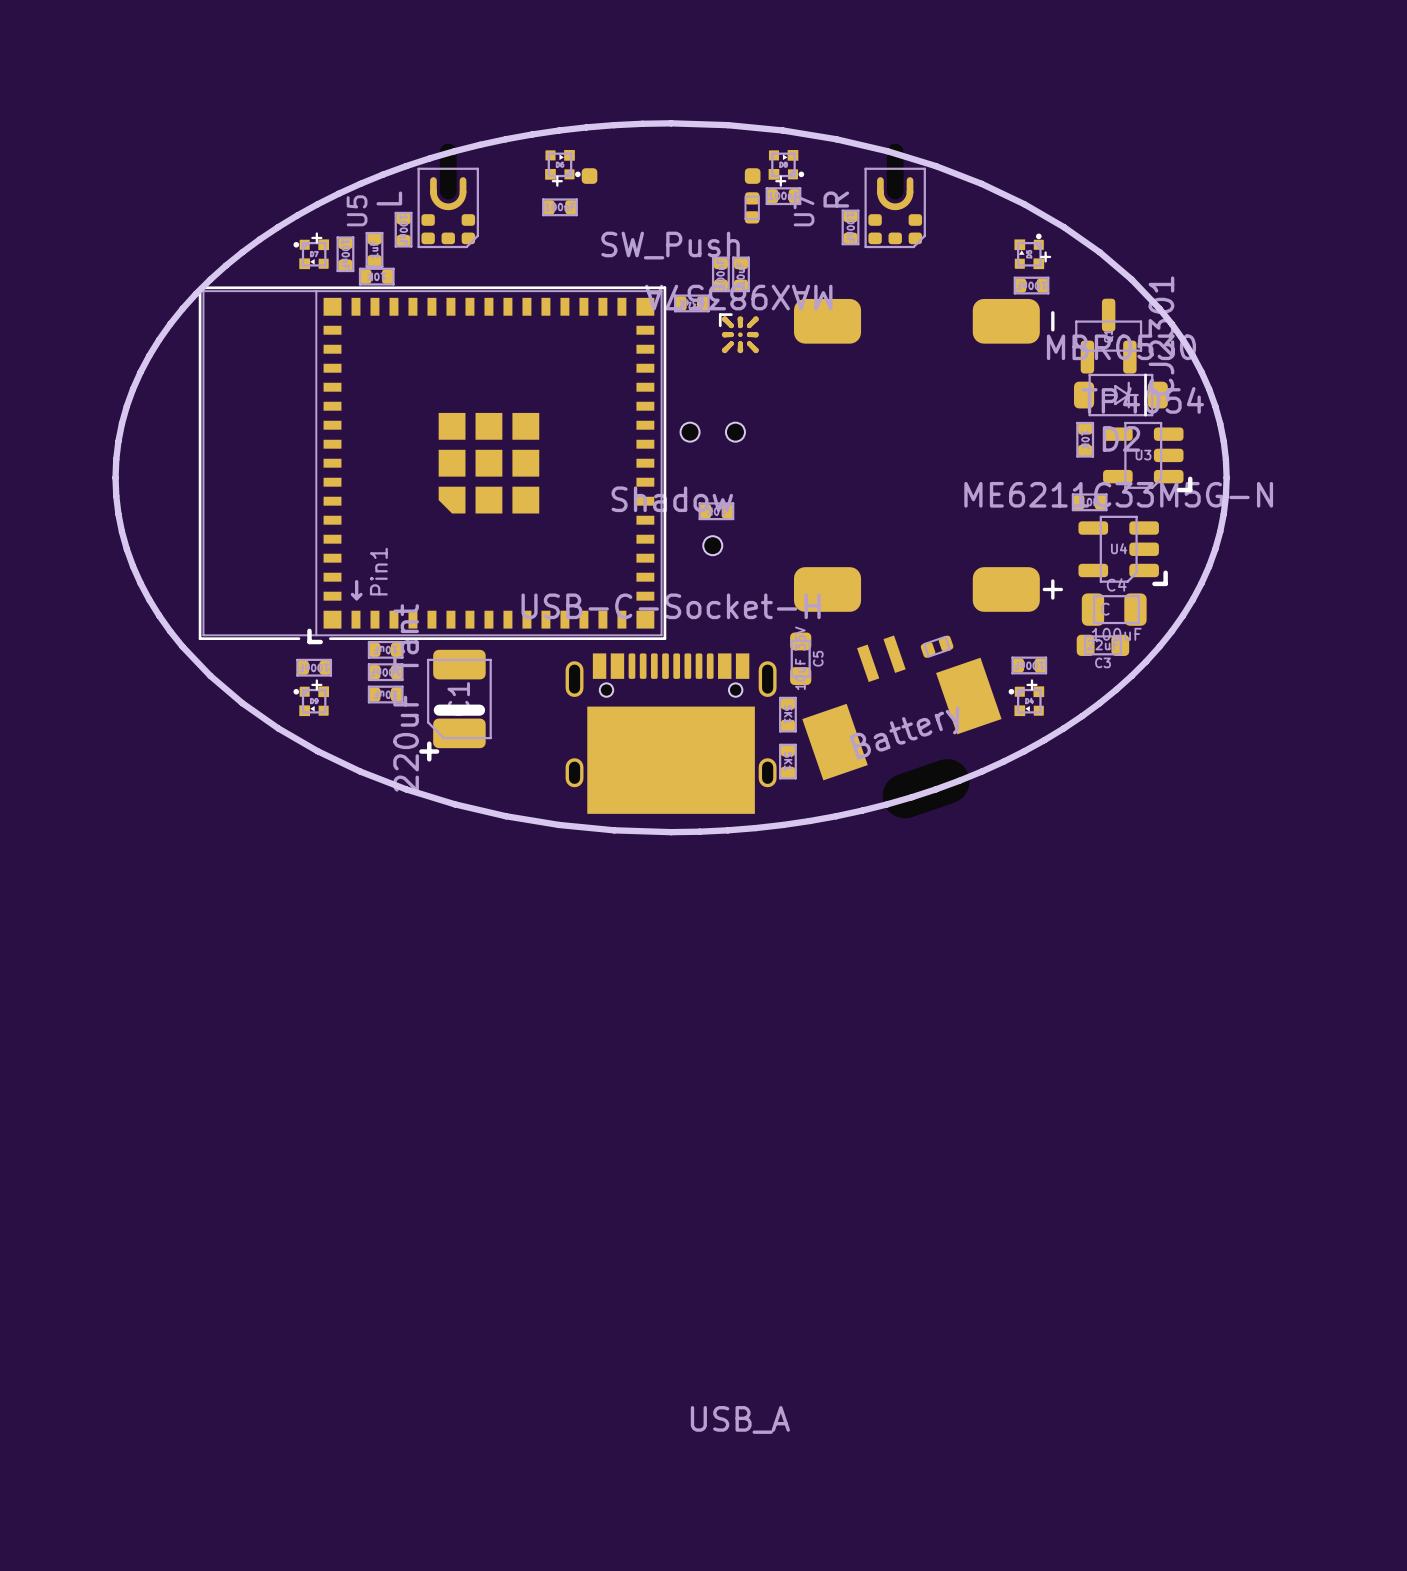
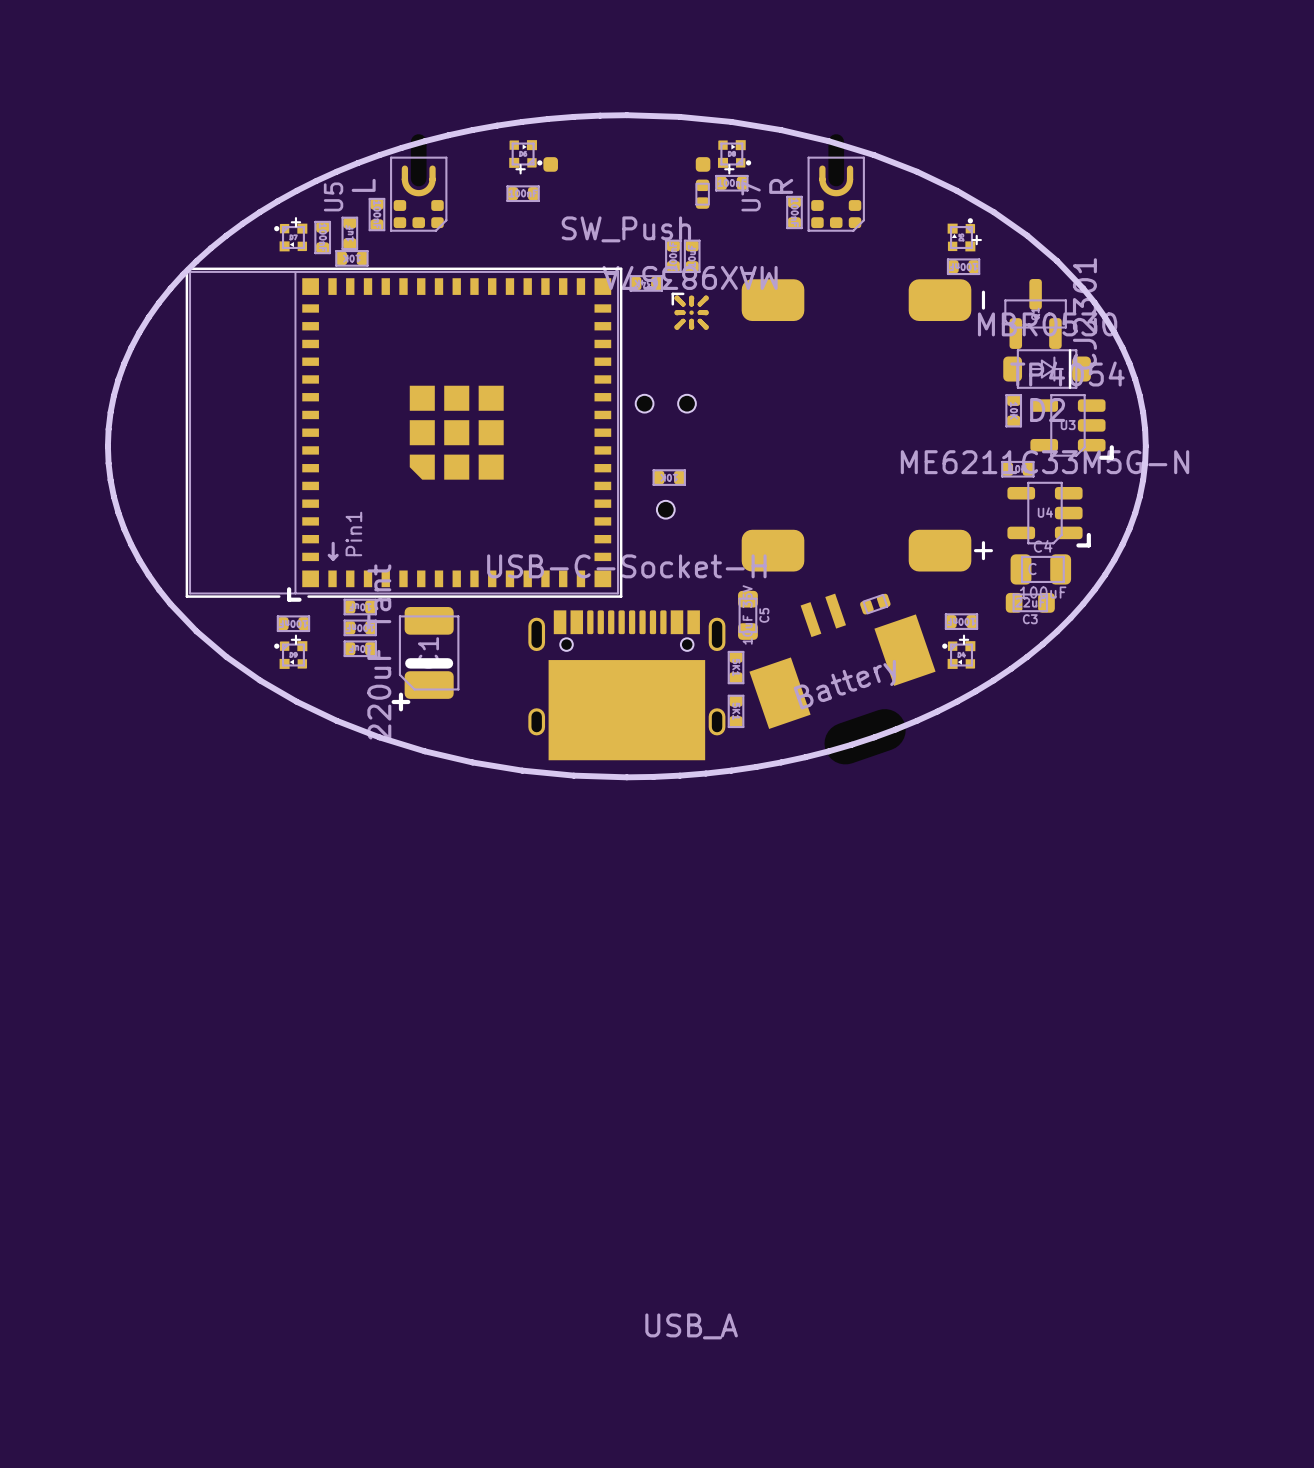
drawing: [611, 486, 734, 513] -> none

